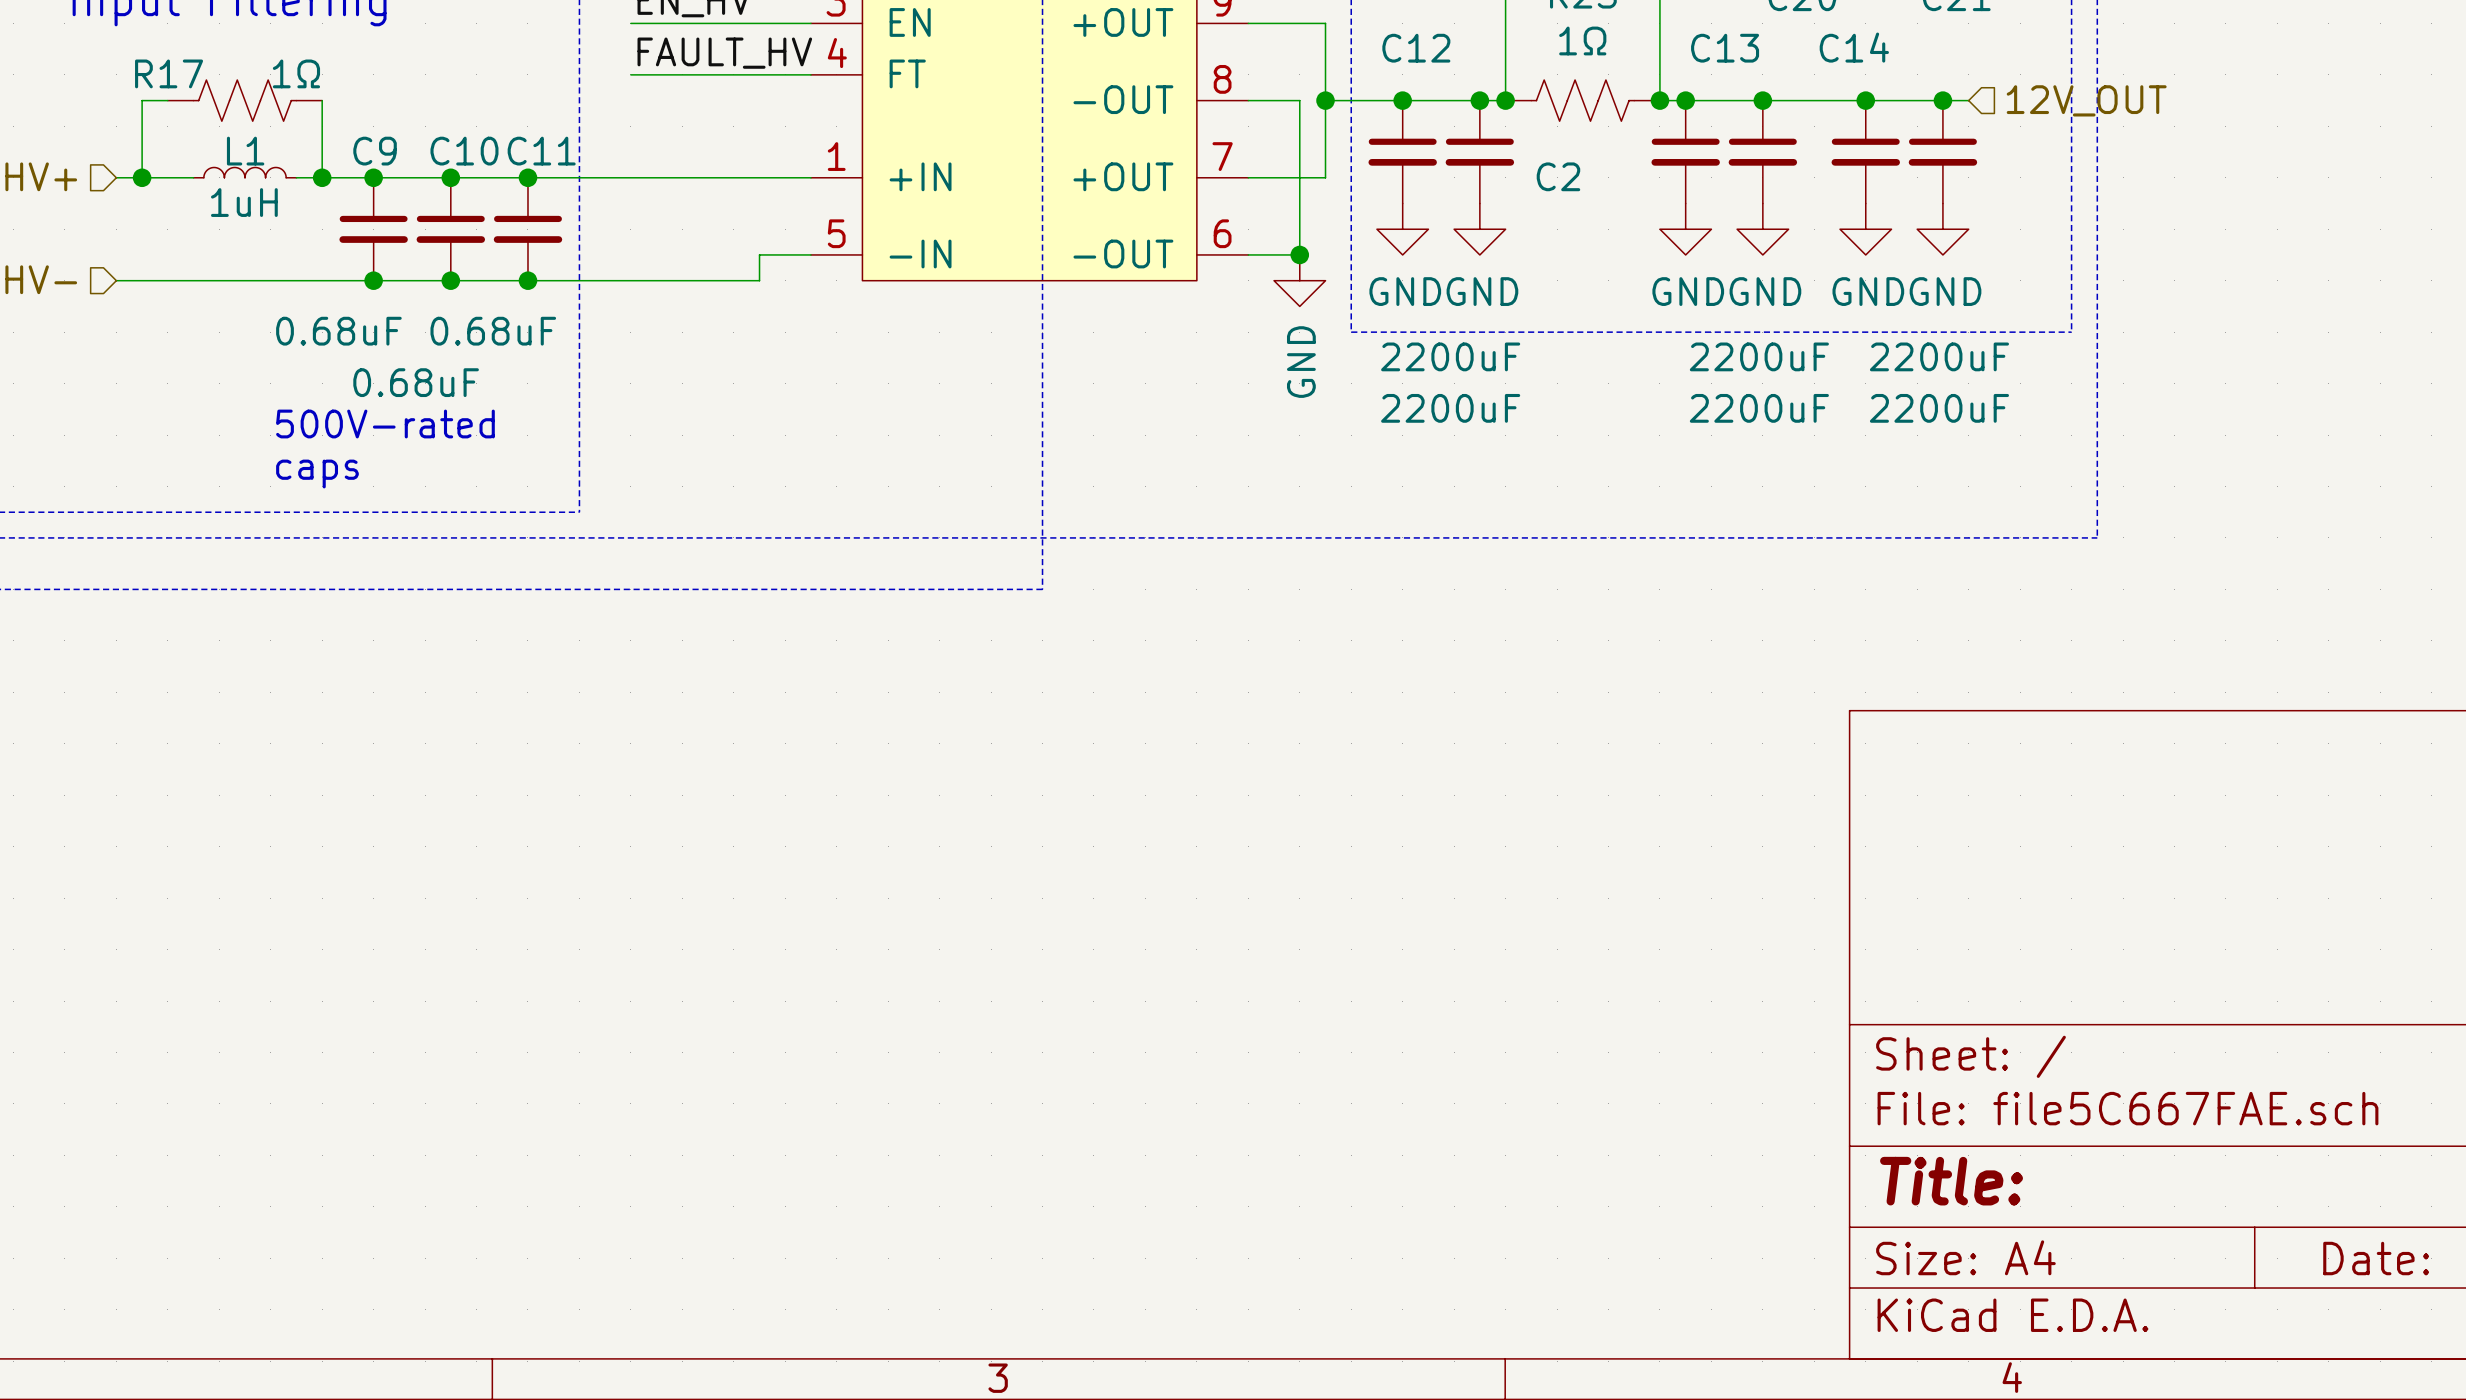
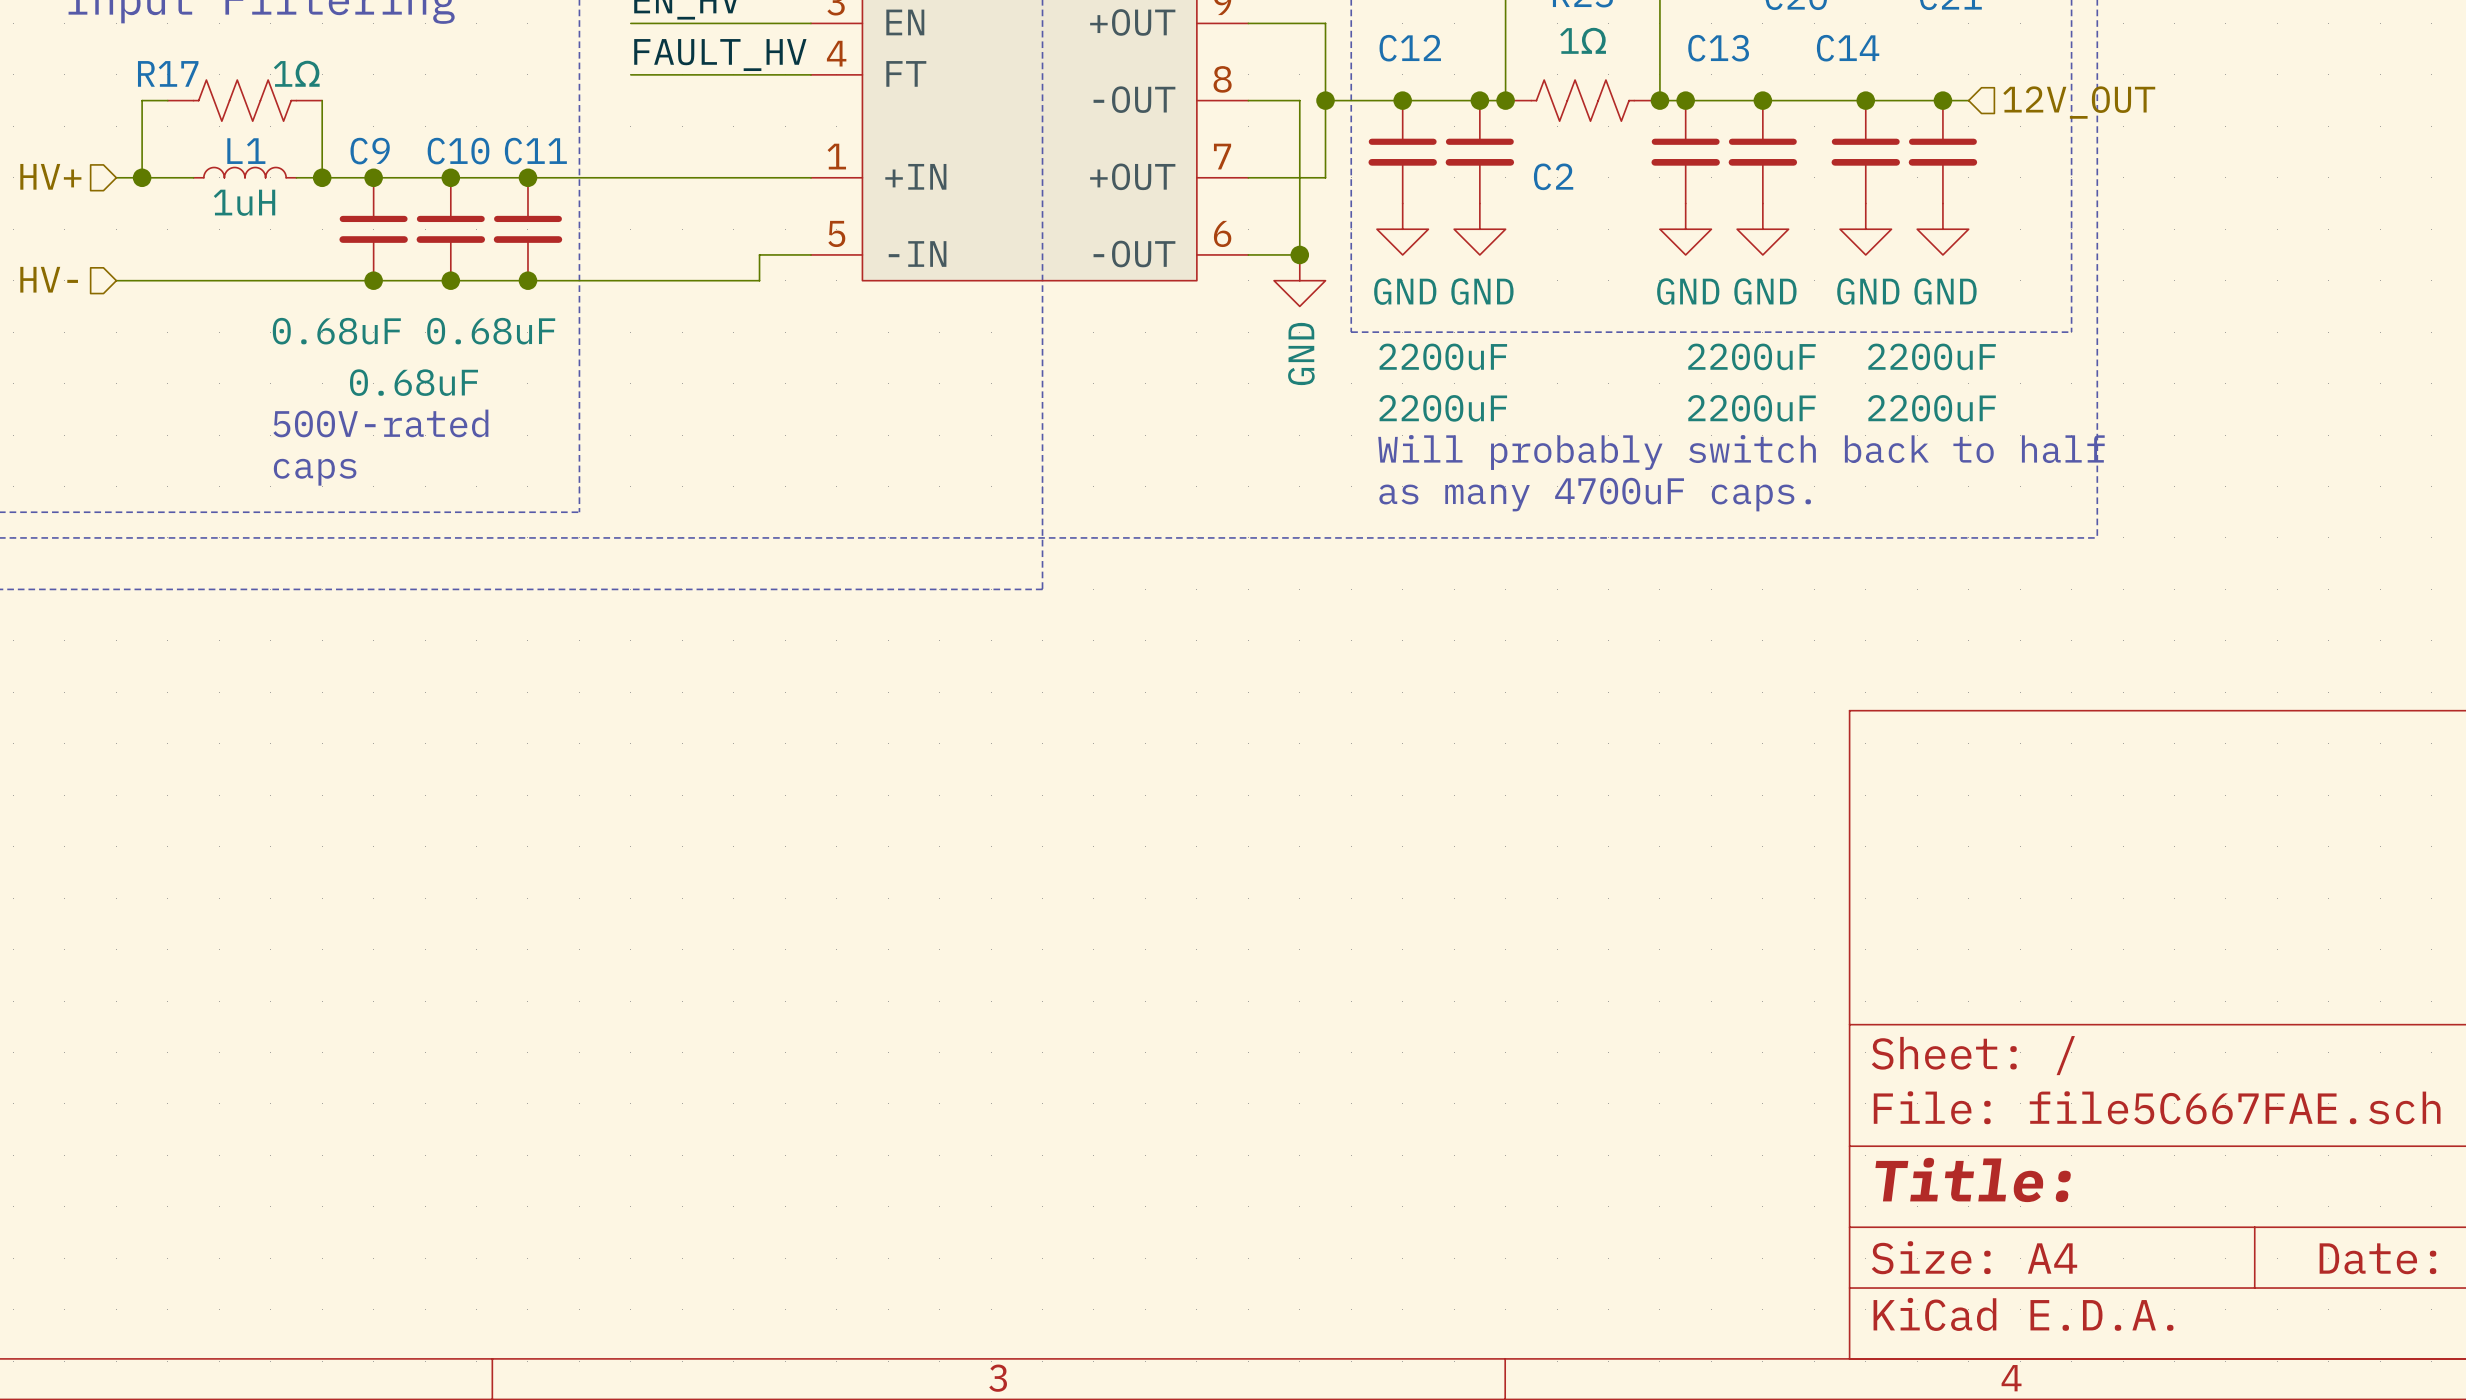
text: none -> Will probably switch back to half (1741, 452)
text: none -> as many 4700uF caps. (1595, 494)

